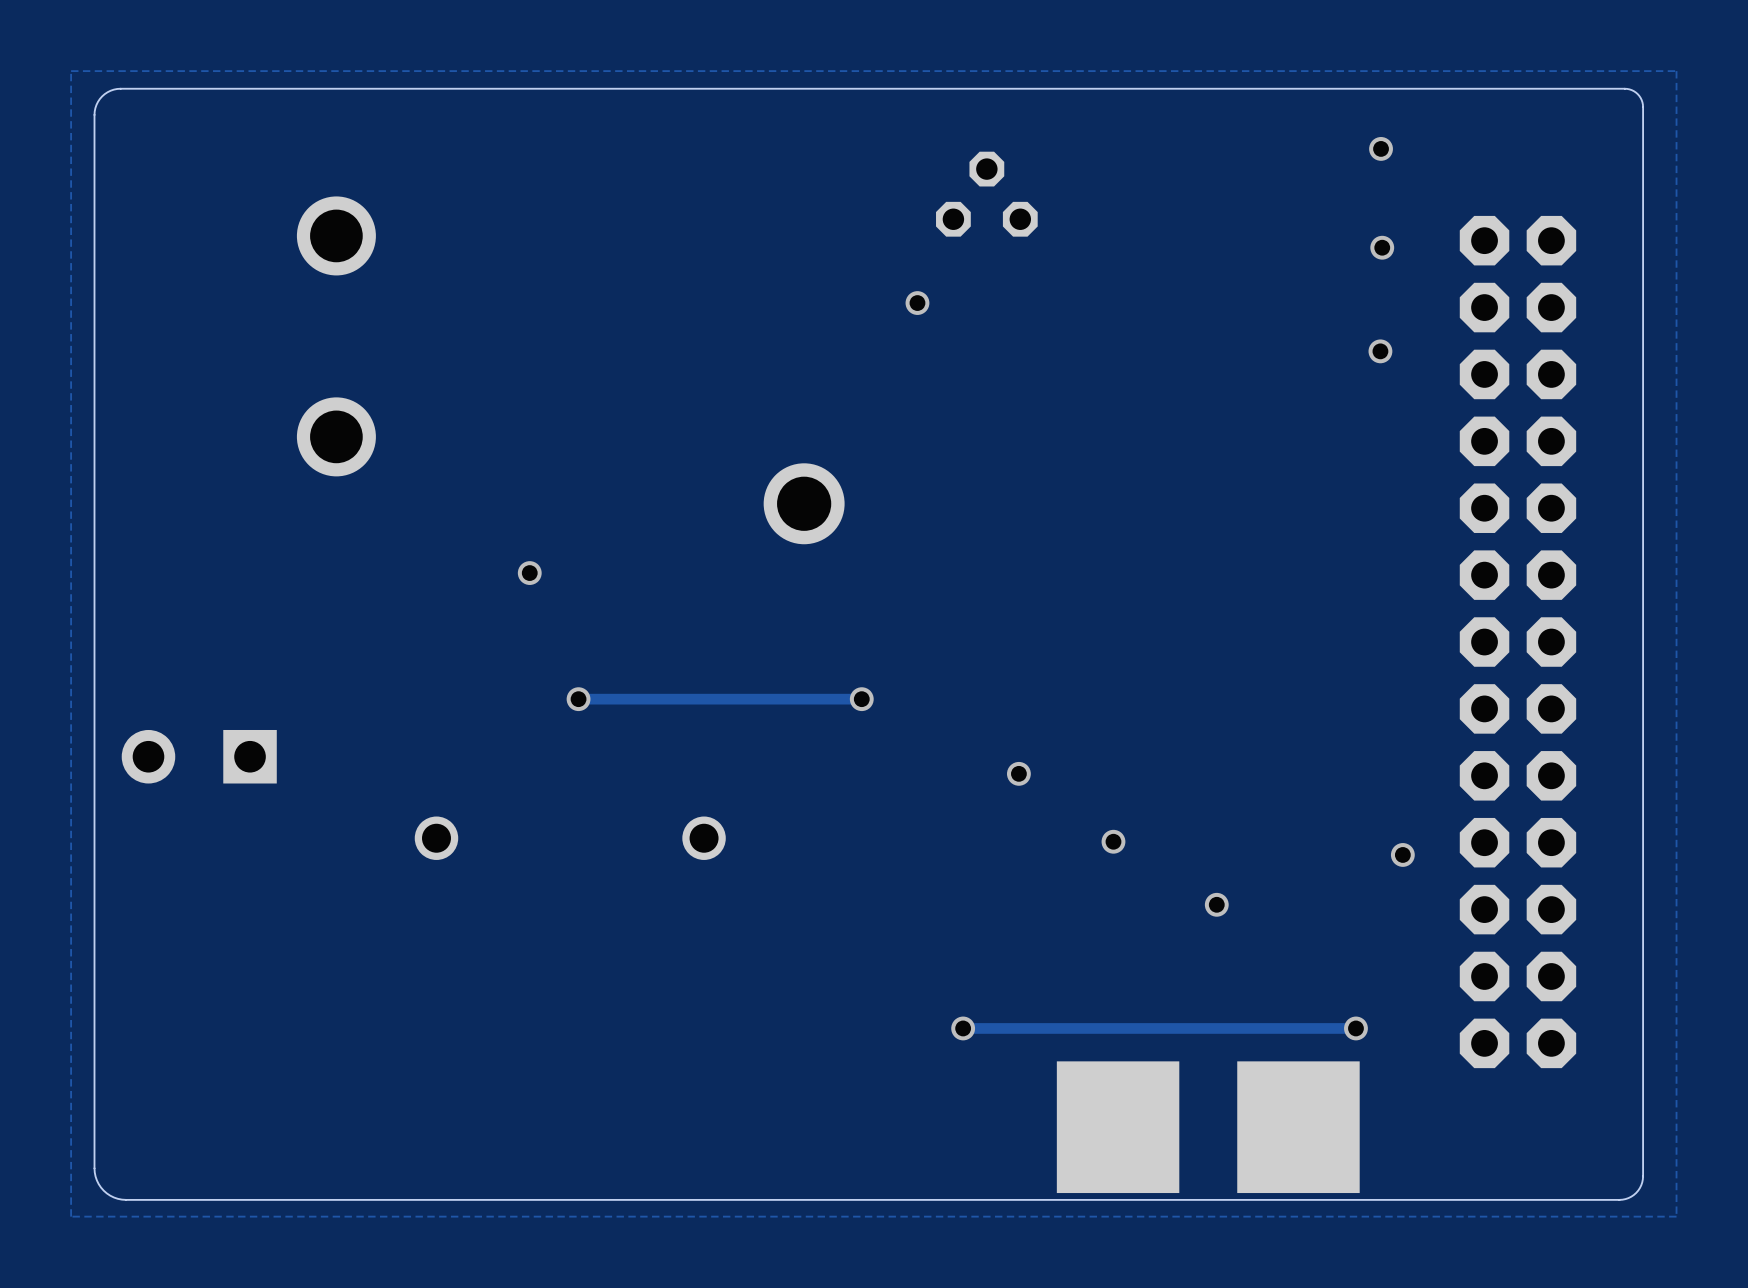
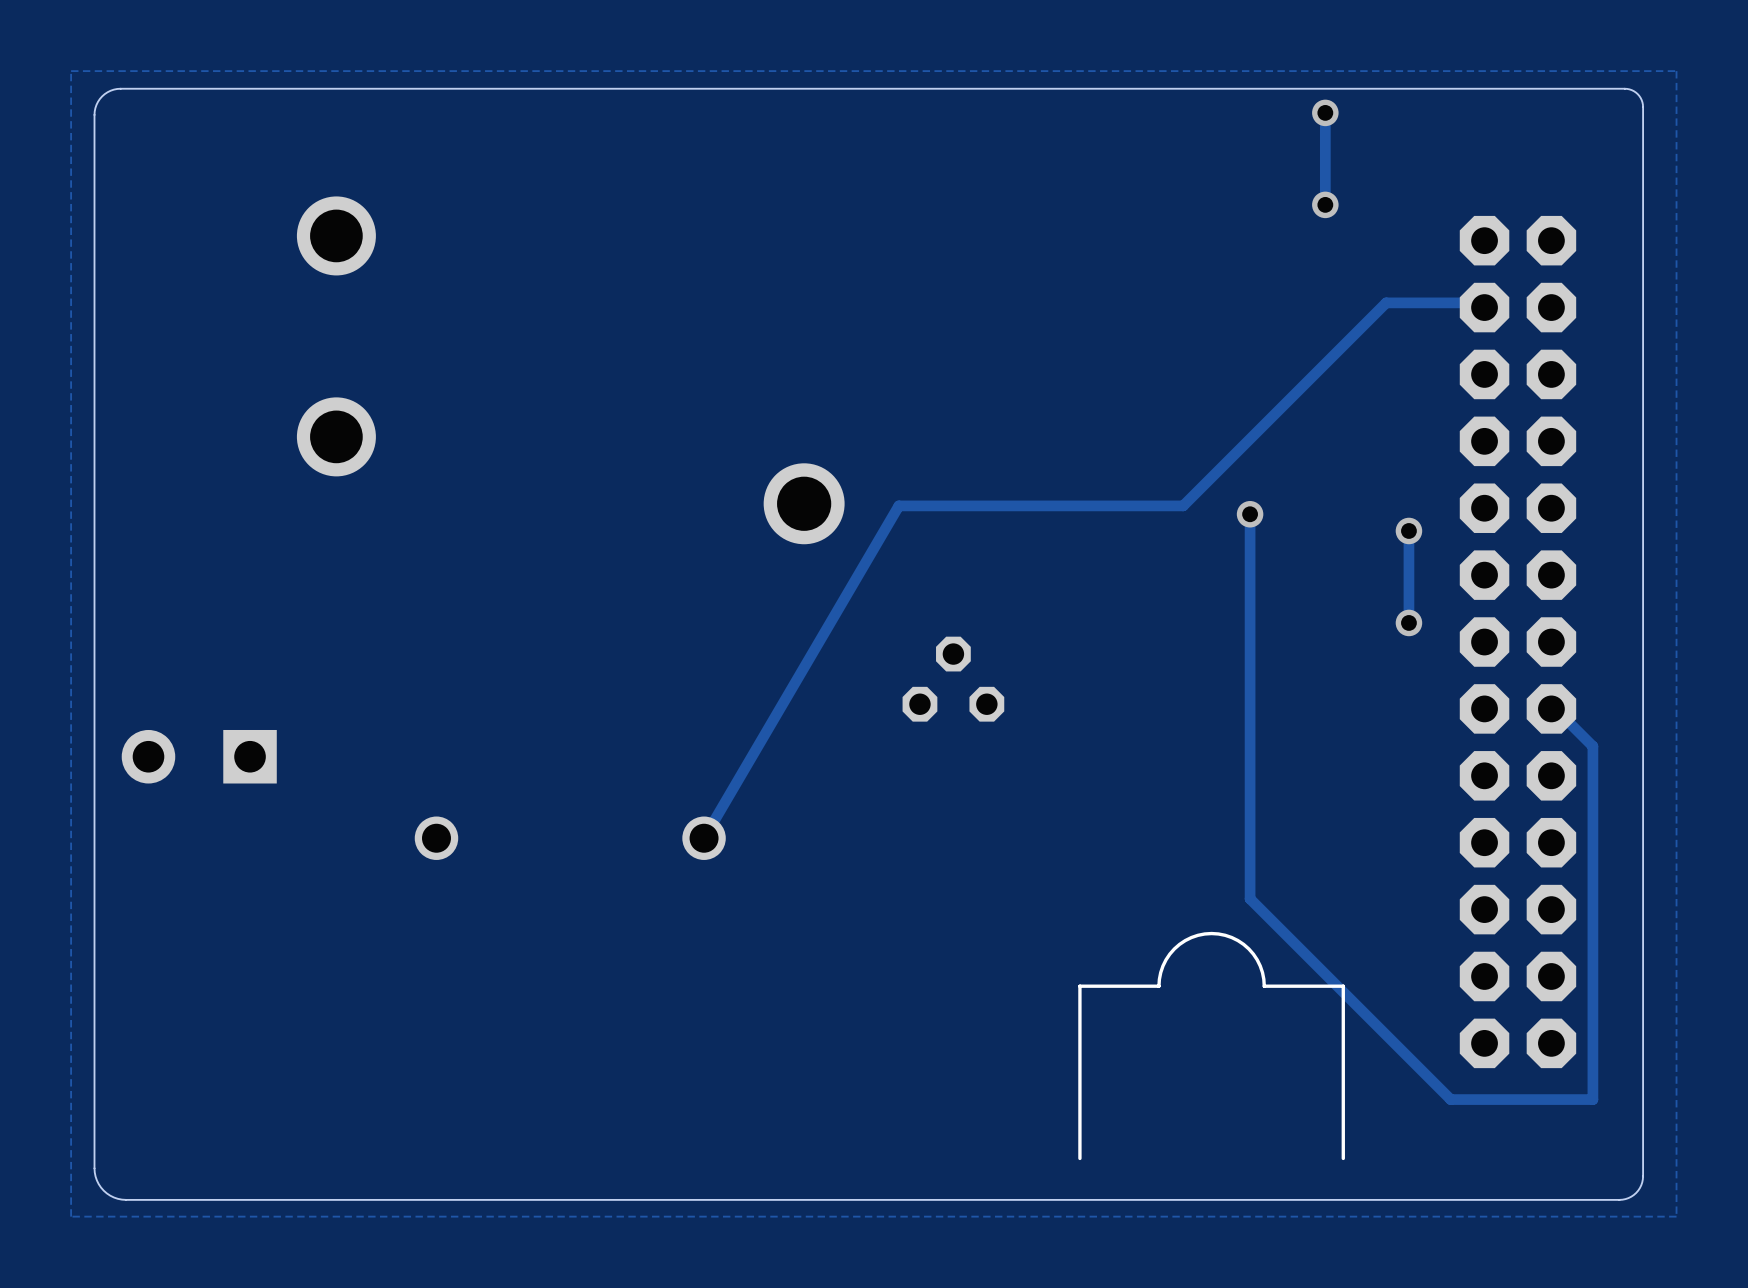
track: none -> (1325, 112) (1325, 204)
via: none -> (1325, 112)
via: (1381, 148) -> none
part position: (986, 194) -> (953, 679)
via: none -> (1325, 204)
via: (1382, 247) -> none
track: none -> (1483, 302) (1386, 302) (1183, 505) (898, 505) (704, 838)
via: (917, 303) -> none
via: (1380, 351) -> none
track: none -> (1250, 514) (1250, 898) (1450, 1099) (1592, 1099) (1592, 746) (1550, 704)
via: none -> (1250, 514)
track: none -> (1408, 530) (1408, 622)
via: none -> (1408, 530)
via: (529, 573) -> none
via: none -> (1408, 622)
via: (578, 699) -> none
track: (861, 699) (578, 699) -> none
via: (861, 699) -> none
via: (1018, 773) -> none
via: (1113, 841) -> none
via: (1402, 854) -> none
via: (1216, 904) -> none
via: (963, 1028) -> none
track: (1355, 1028) (963, 1028) -> none
via: (1355, 1028) -> none
part: none -> (1211, 1045)
part: (1208, 1127) -> none

